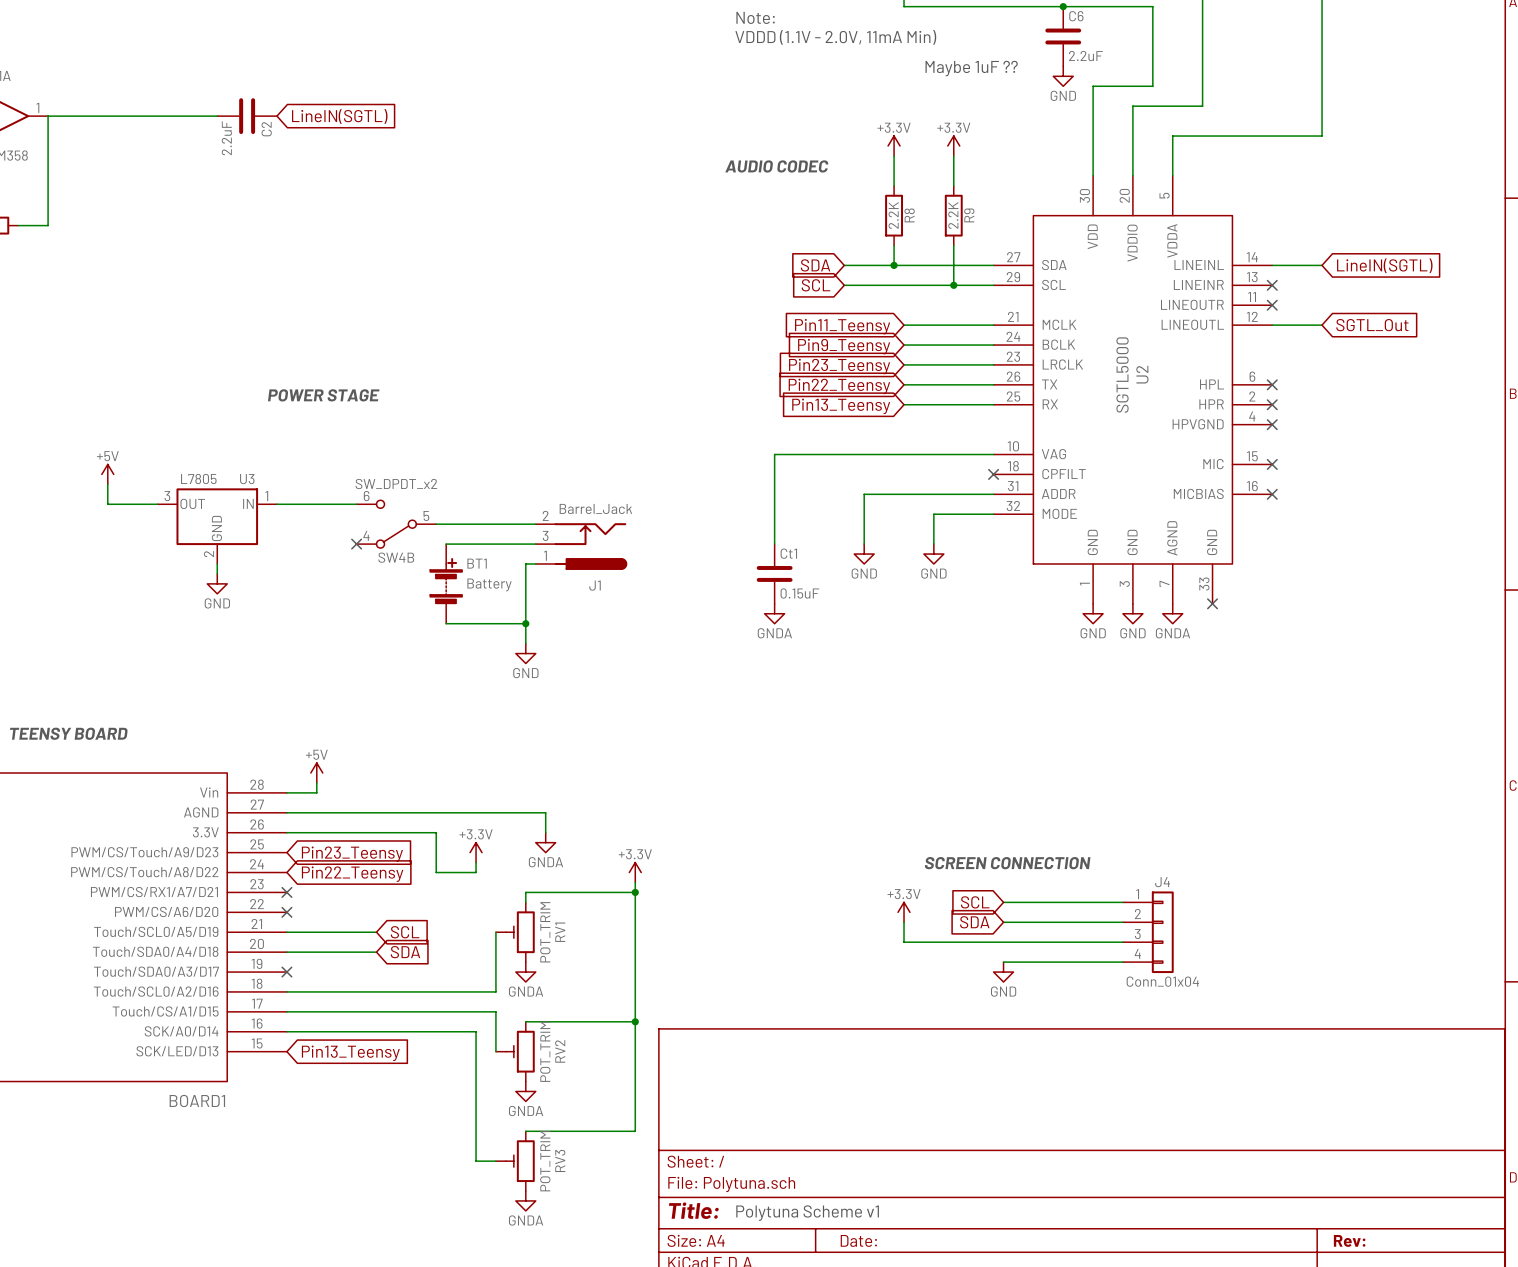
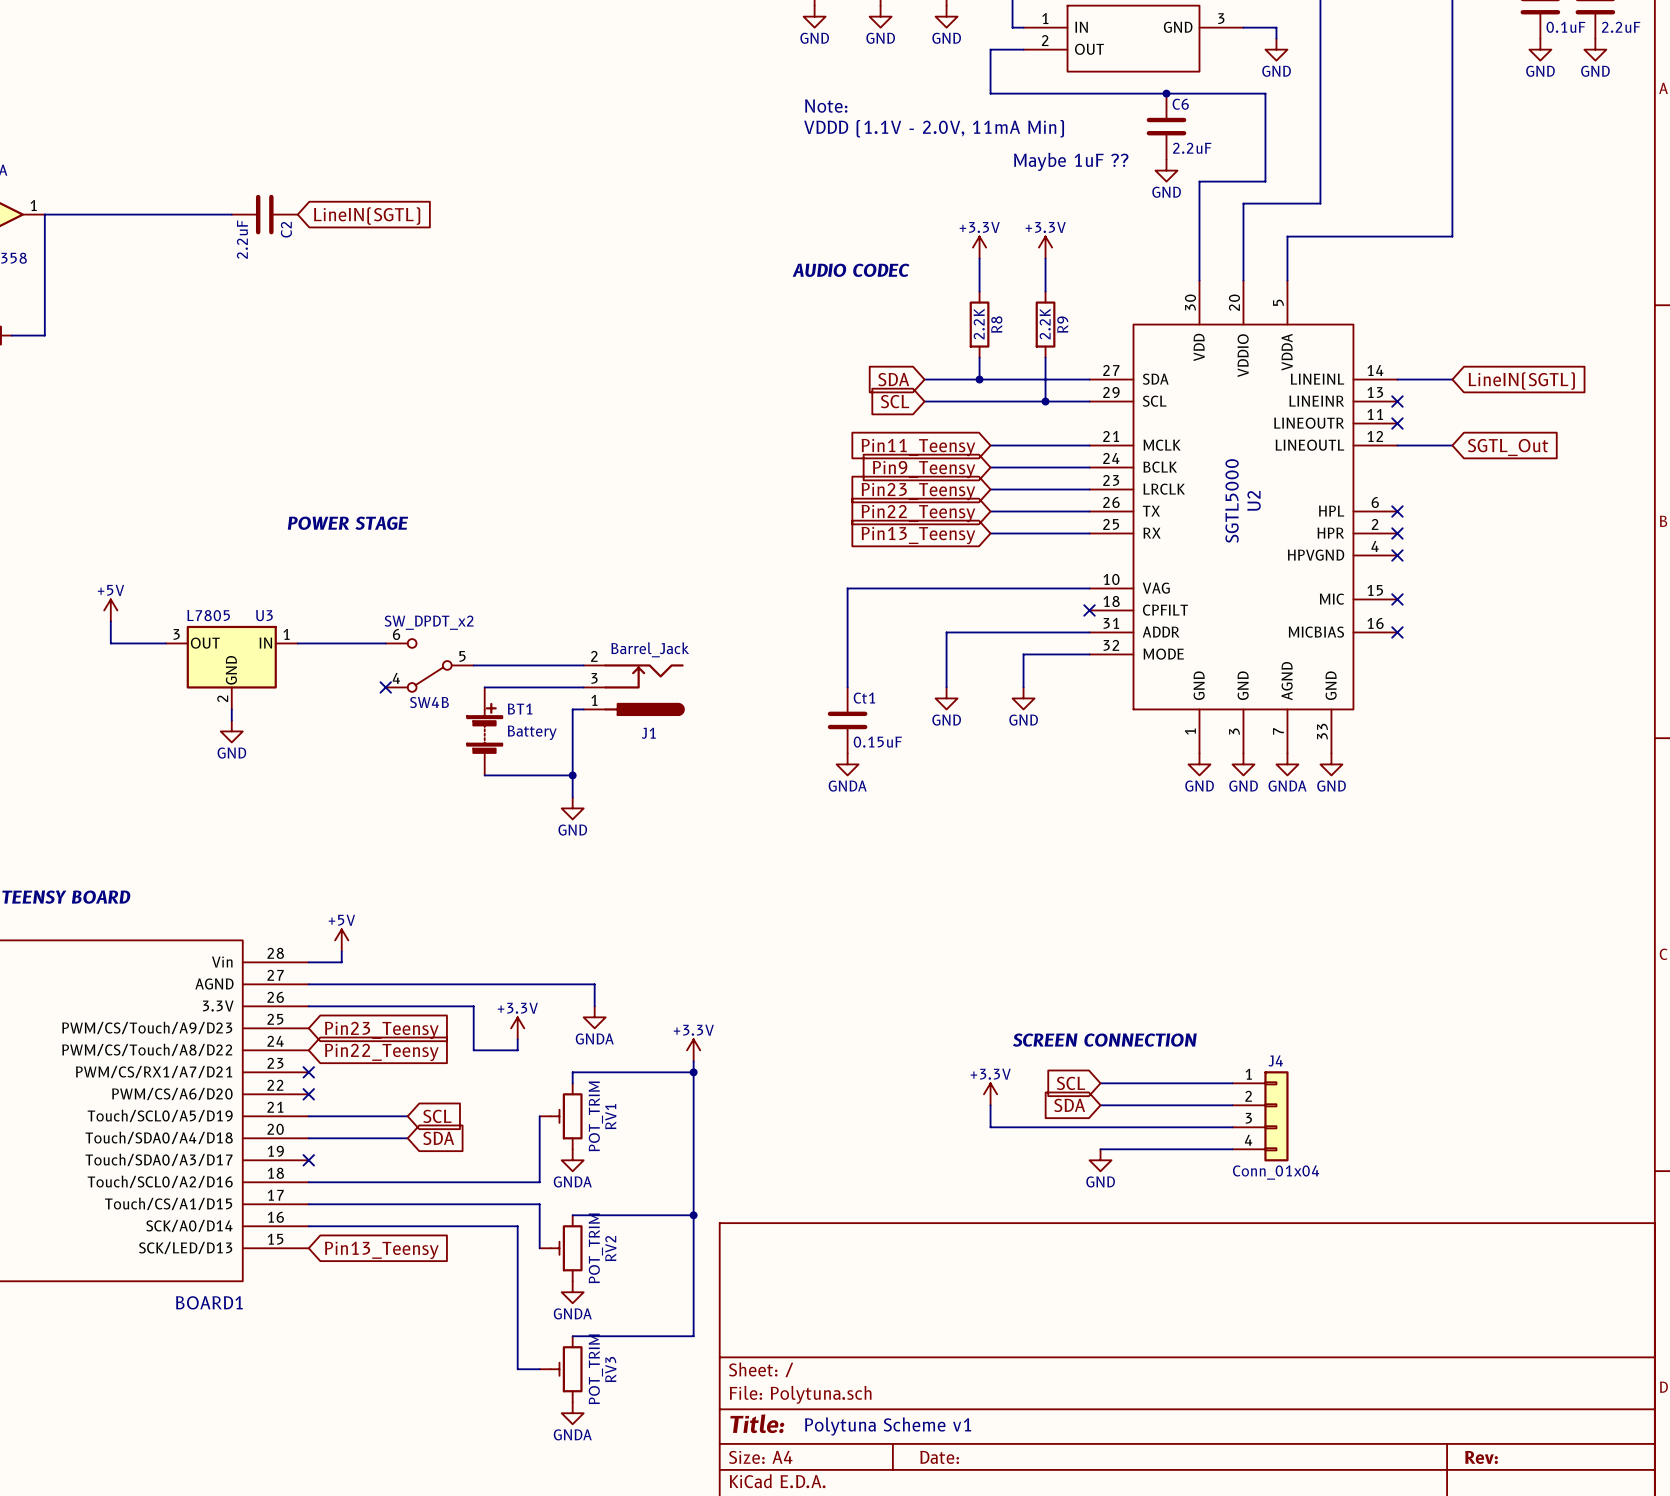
no-connect mark: (1212, 603) -> none
power symbol: none -> GND (1331, 764)

